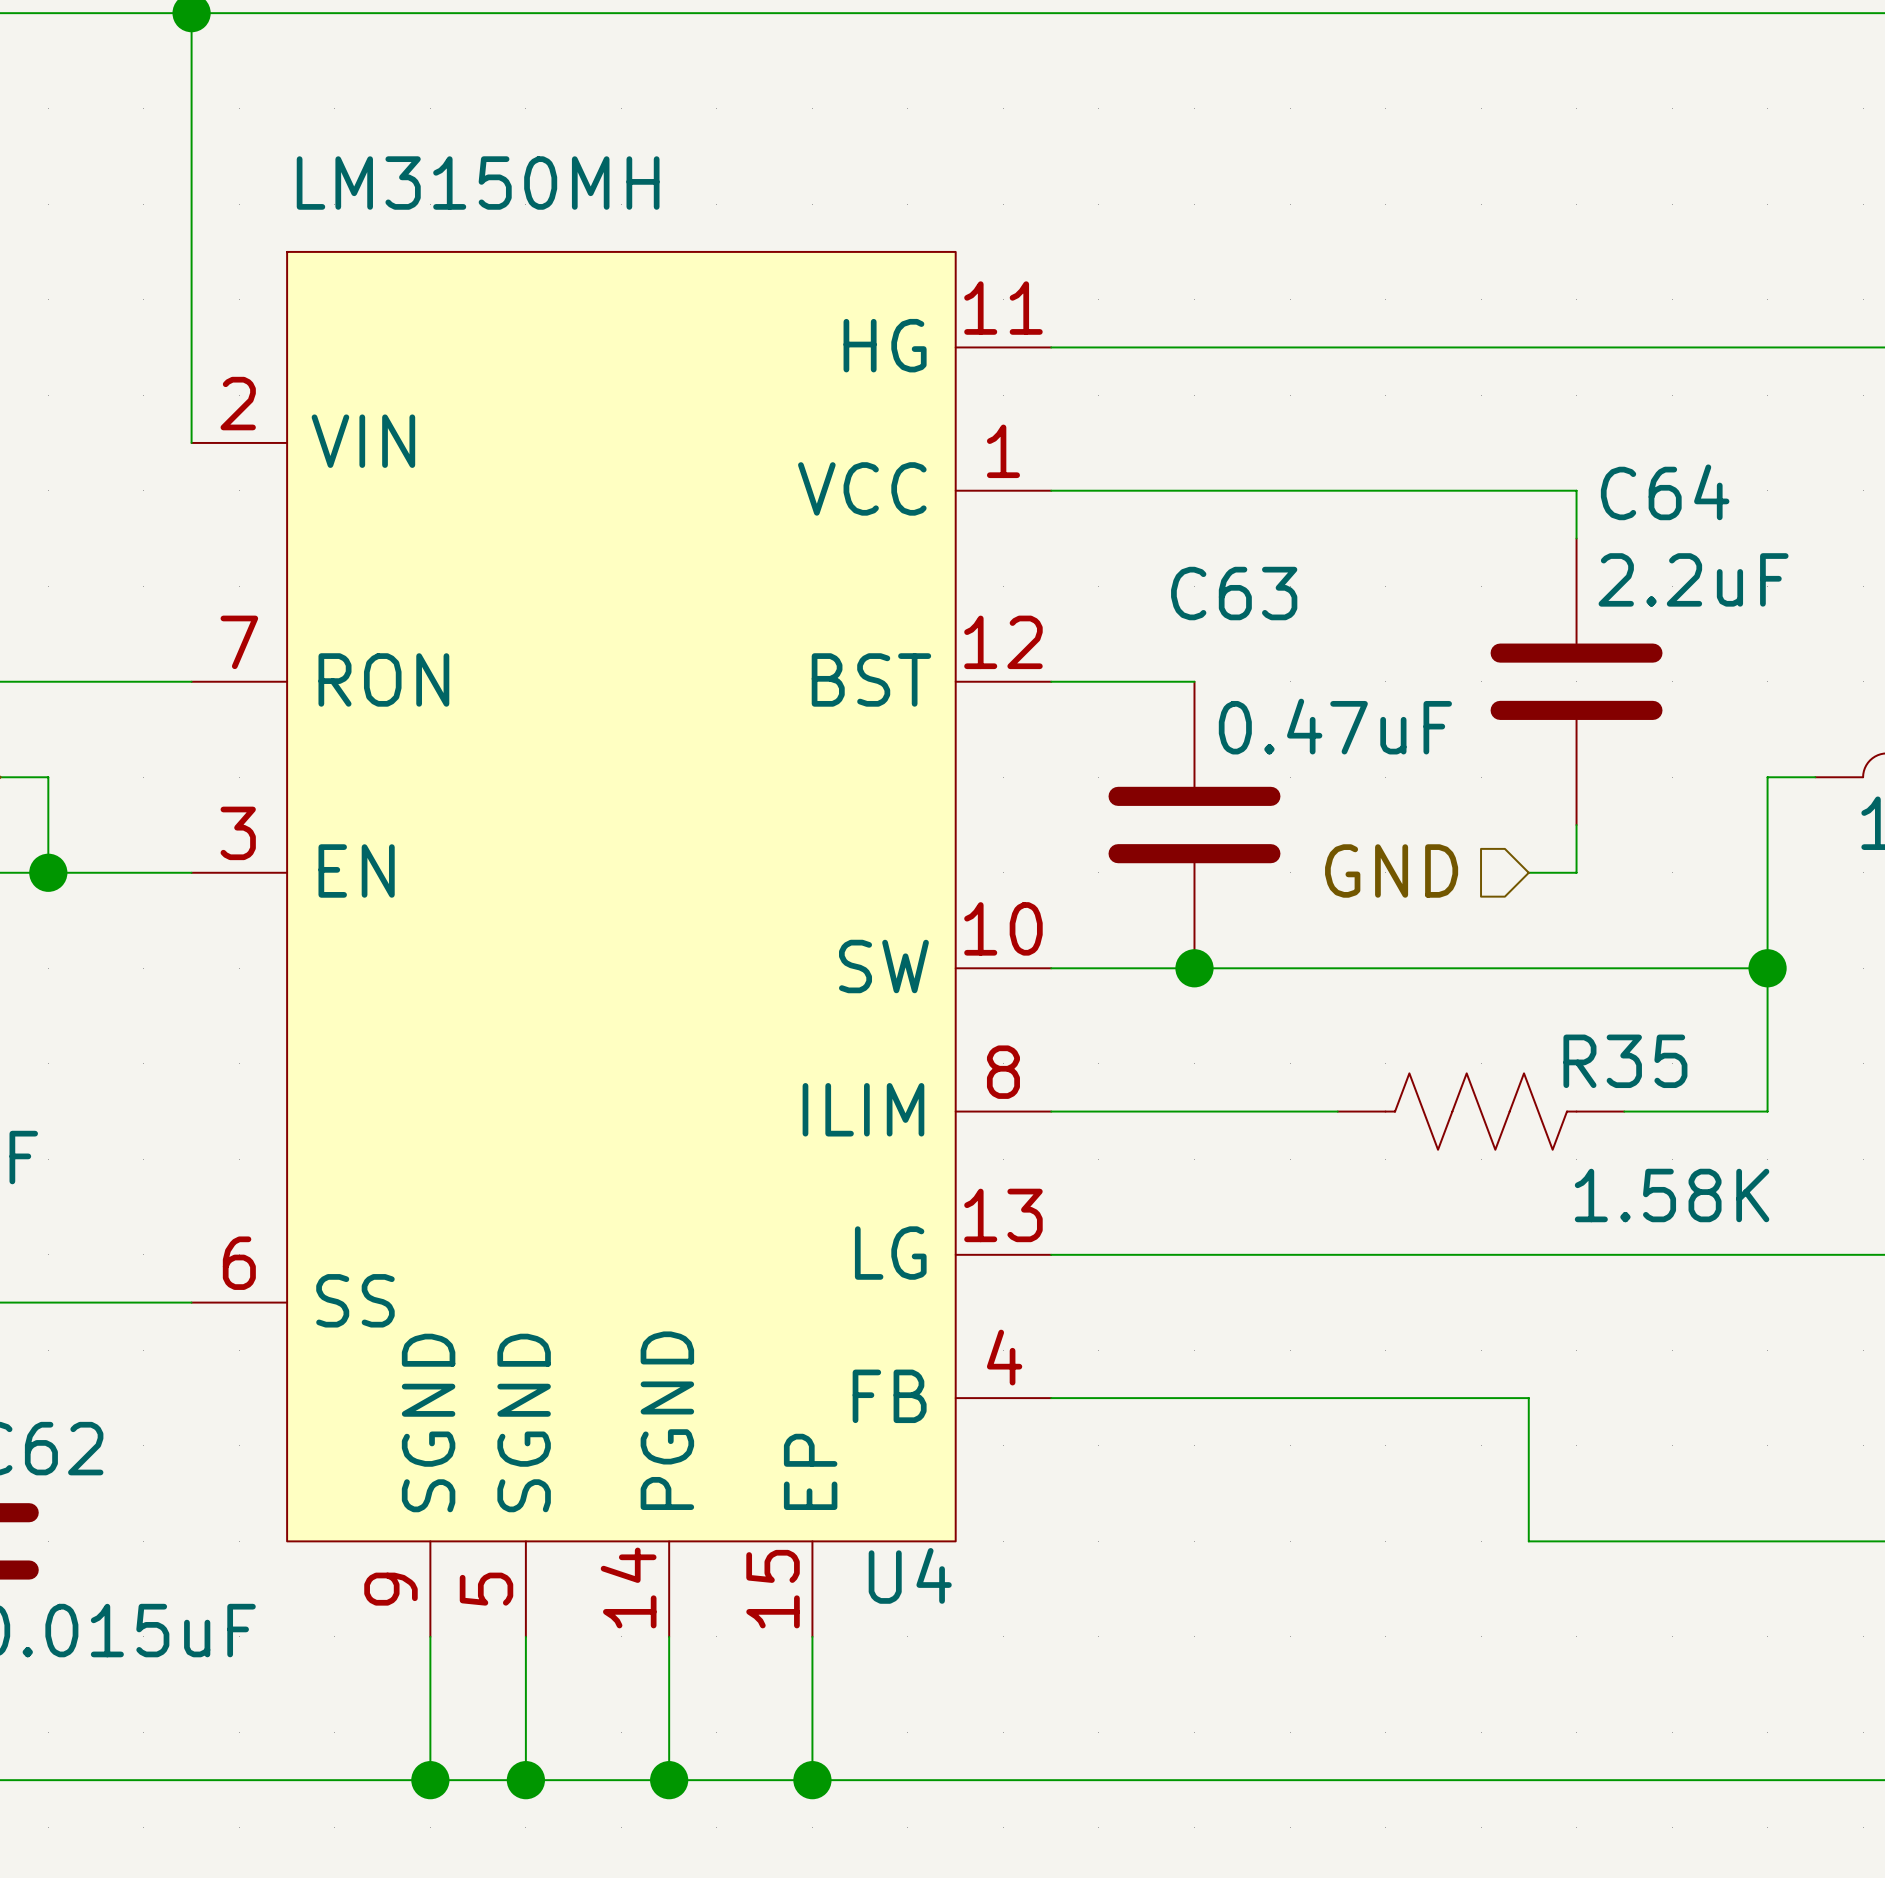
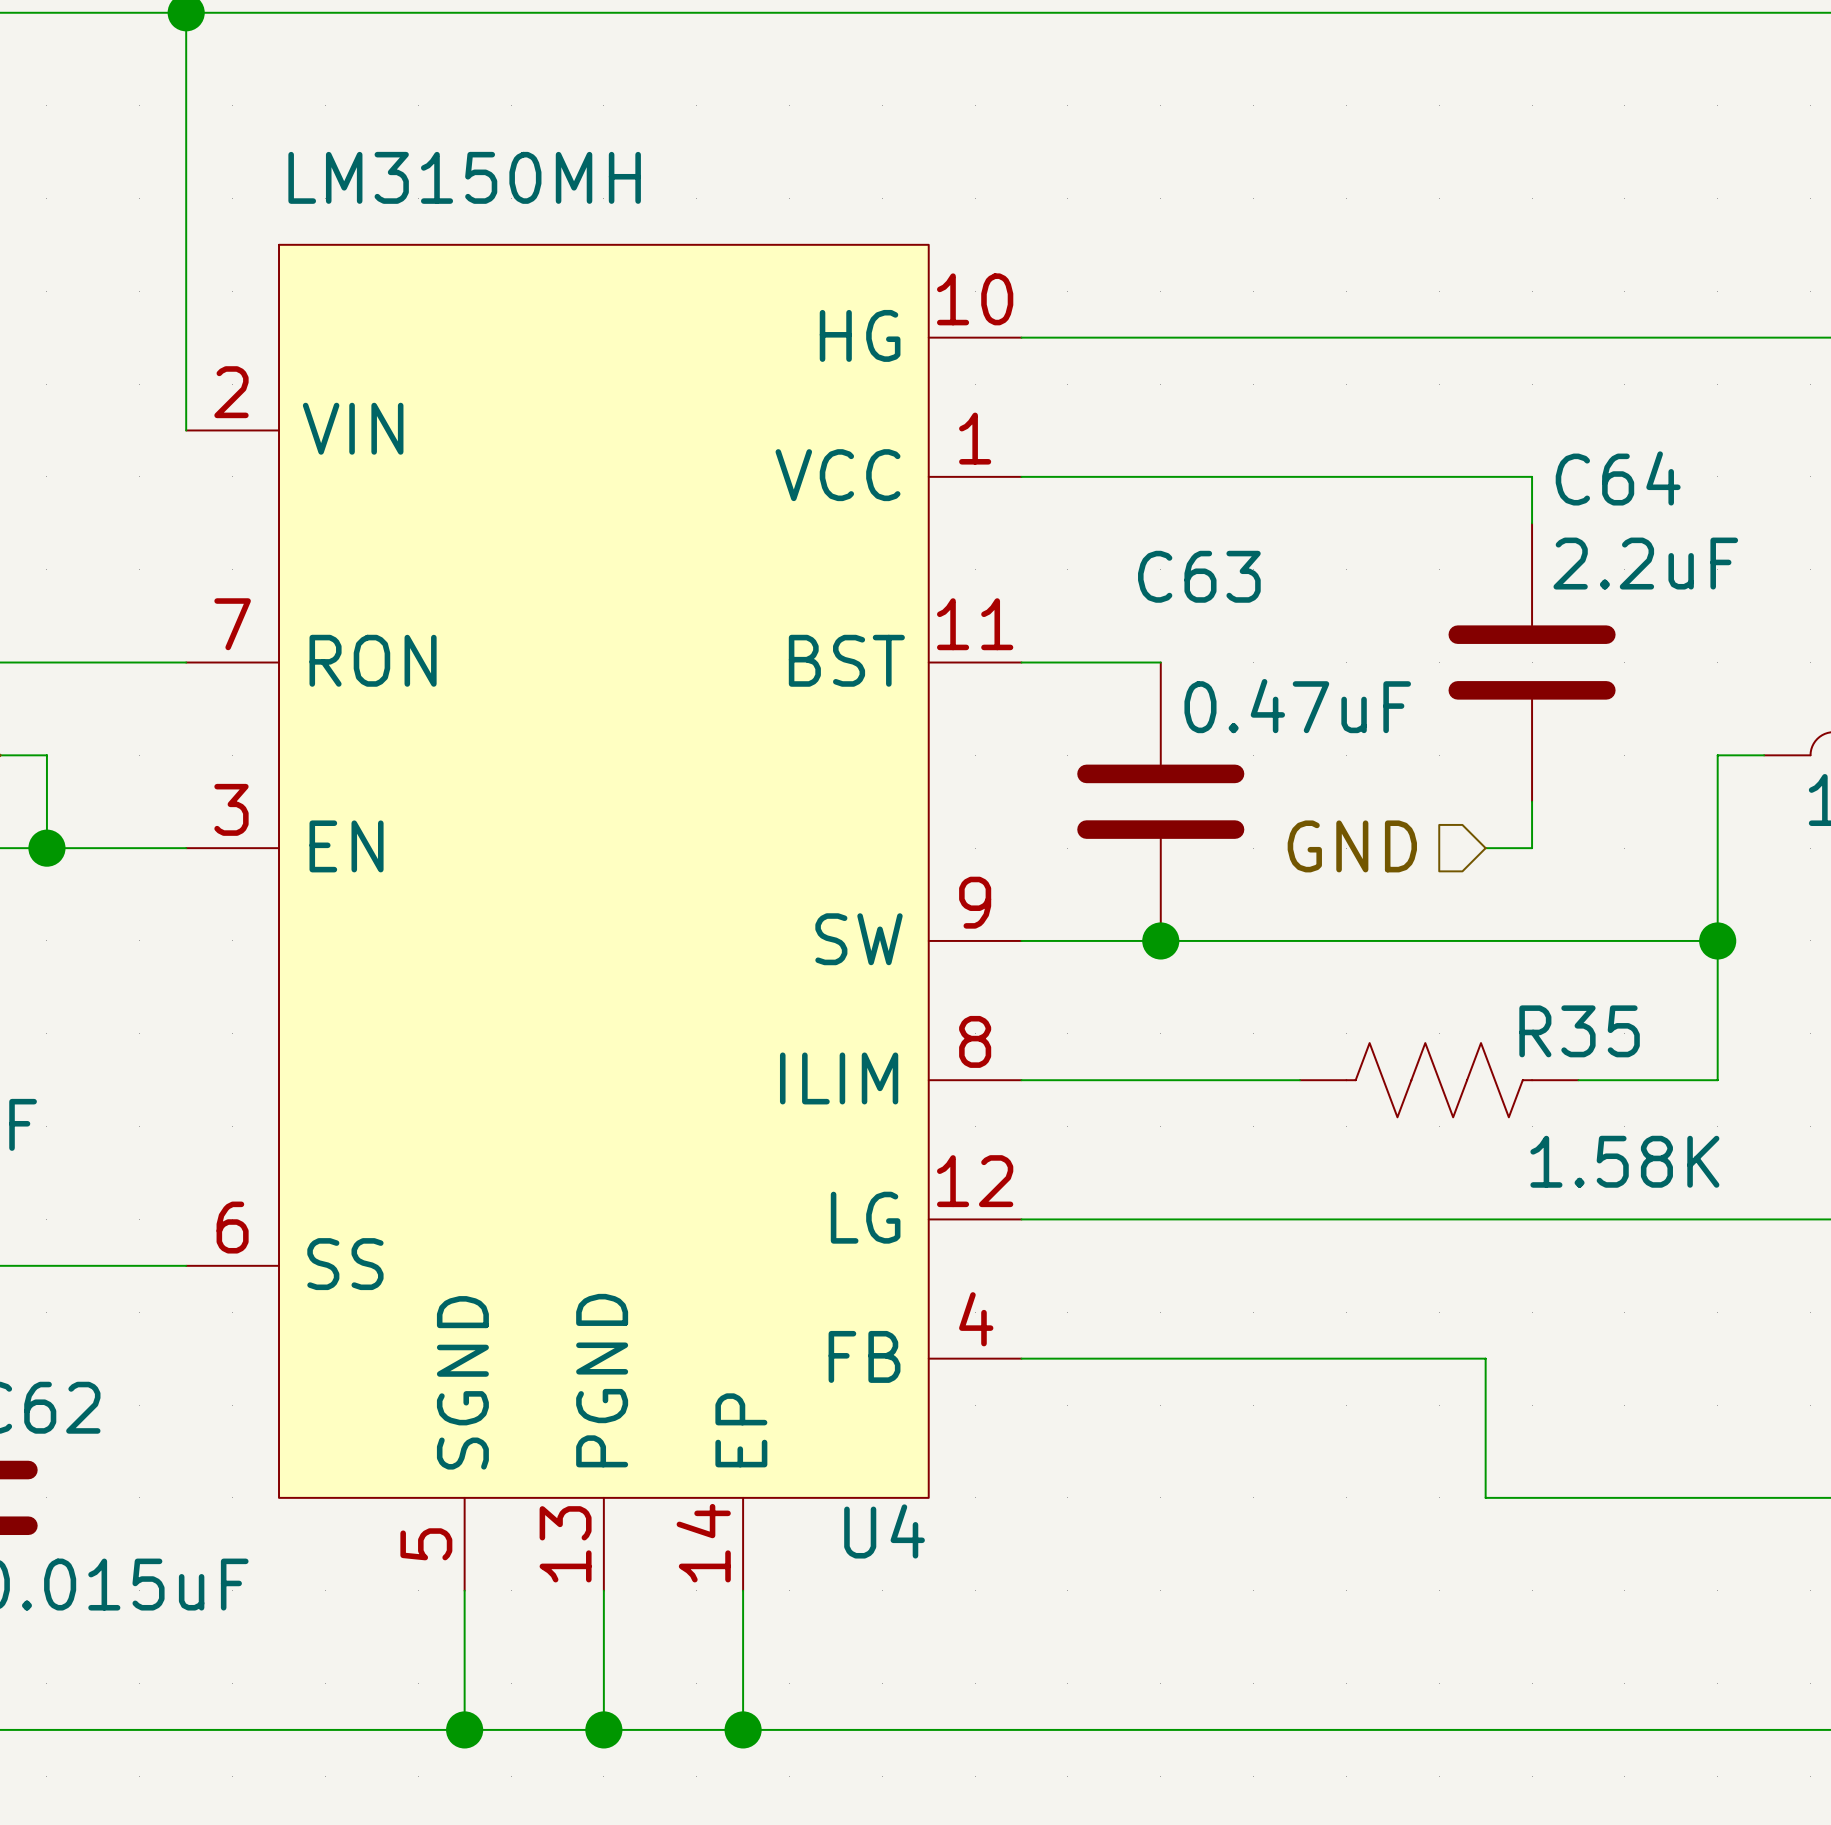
U4 symbol: [191, 251, 1052, 1637] -> [186, 244, 1022, 1591]
wire: (430, 1636) (430, 1780) -> (464, 1590) (464, 1729)
wire: (525, 1636) (525, 1780) -> none
wire: (669, 1636) (669, 1780) -> (603, 1590) (603, 1729)
wire: (812, 1636) (812, 1780) -> (743, 1590) (743, 1729)
junction: (430, 1780) -> none
junction: none -> (464, 1729)
junction: (525, 1780) -> none
junction: none -> (603, 1729)
junction: (669, 1780) -> none
junction: none -> (743, 1729)
junction: (812, 1780) -> none

